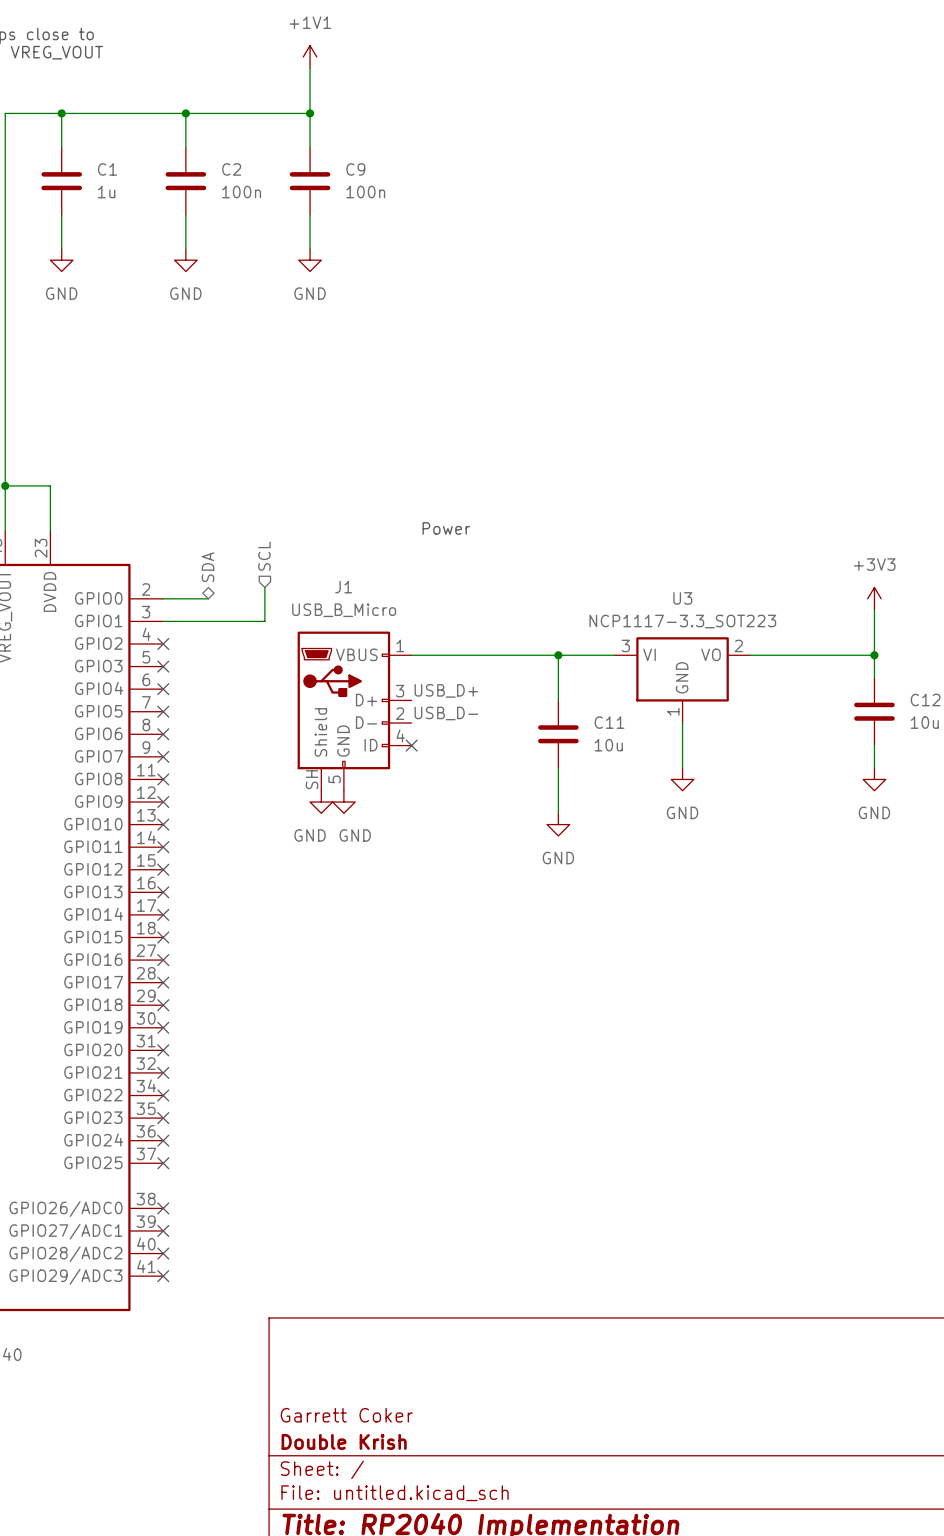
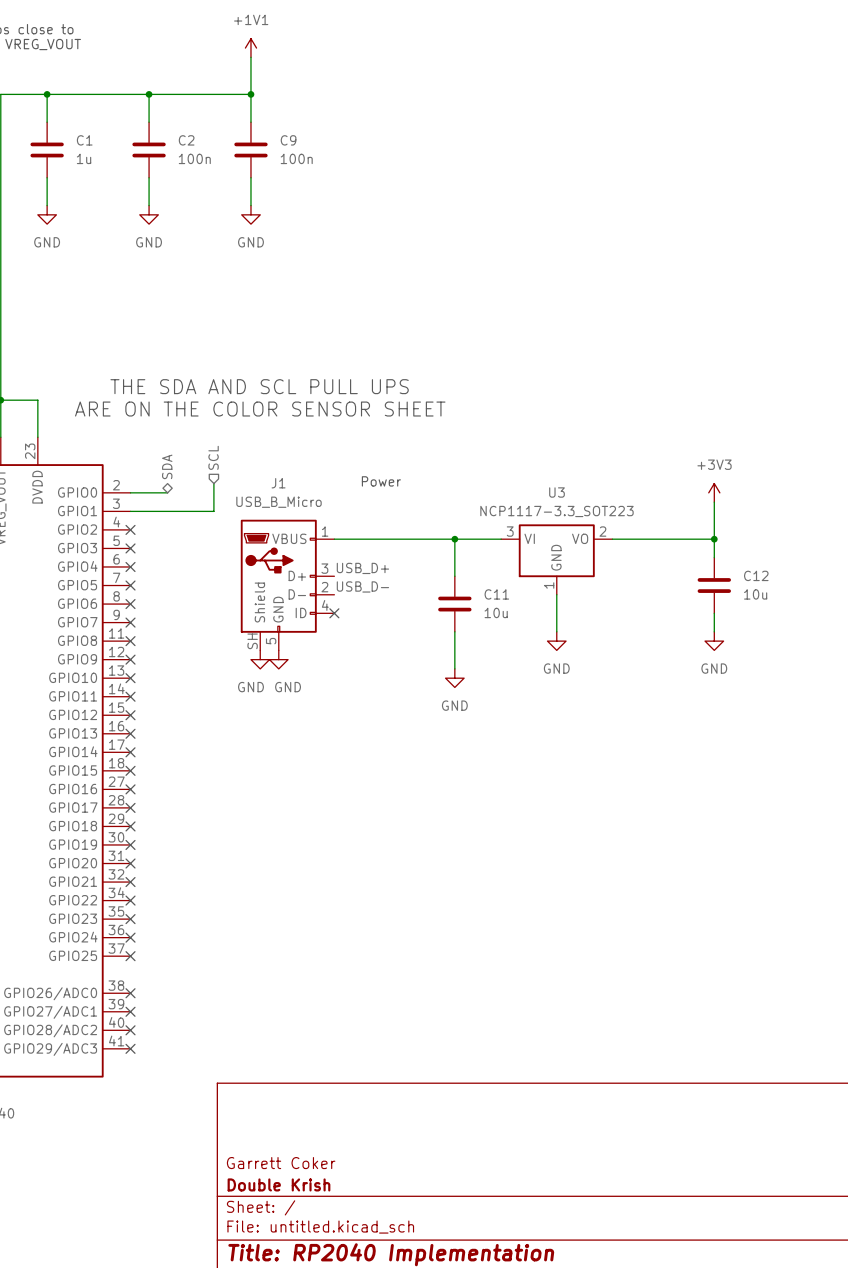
text: none -> THE SDA AND SCL PULL UPS (259, 386)
text: none -> ARE ON THE COLOR SENSOR SHEET (260, 409)
text position: Power (446, 528) -> Power (381, 481)

